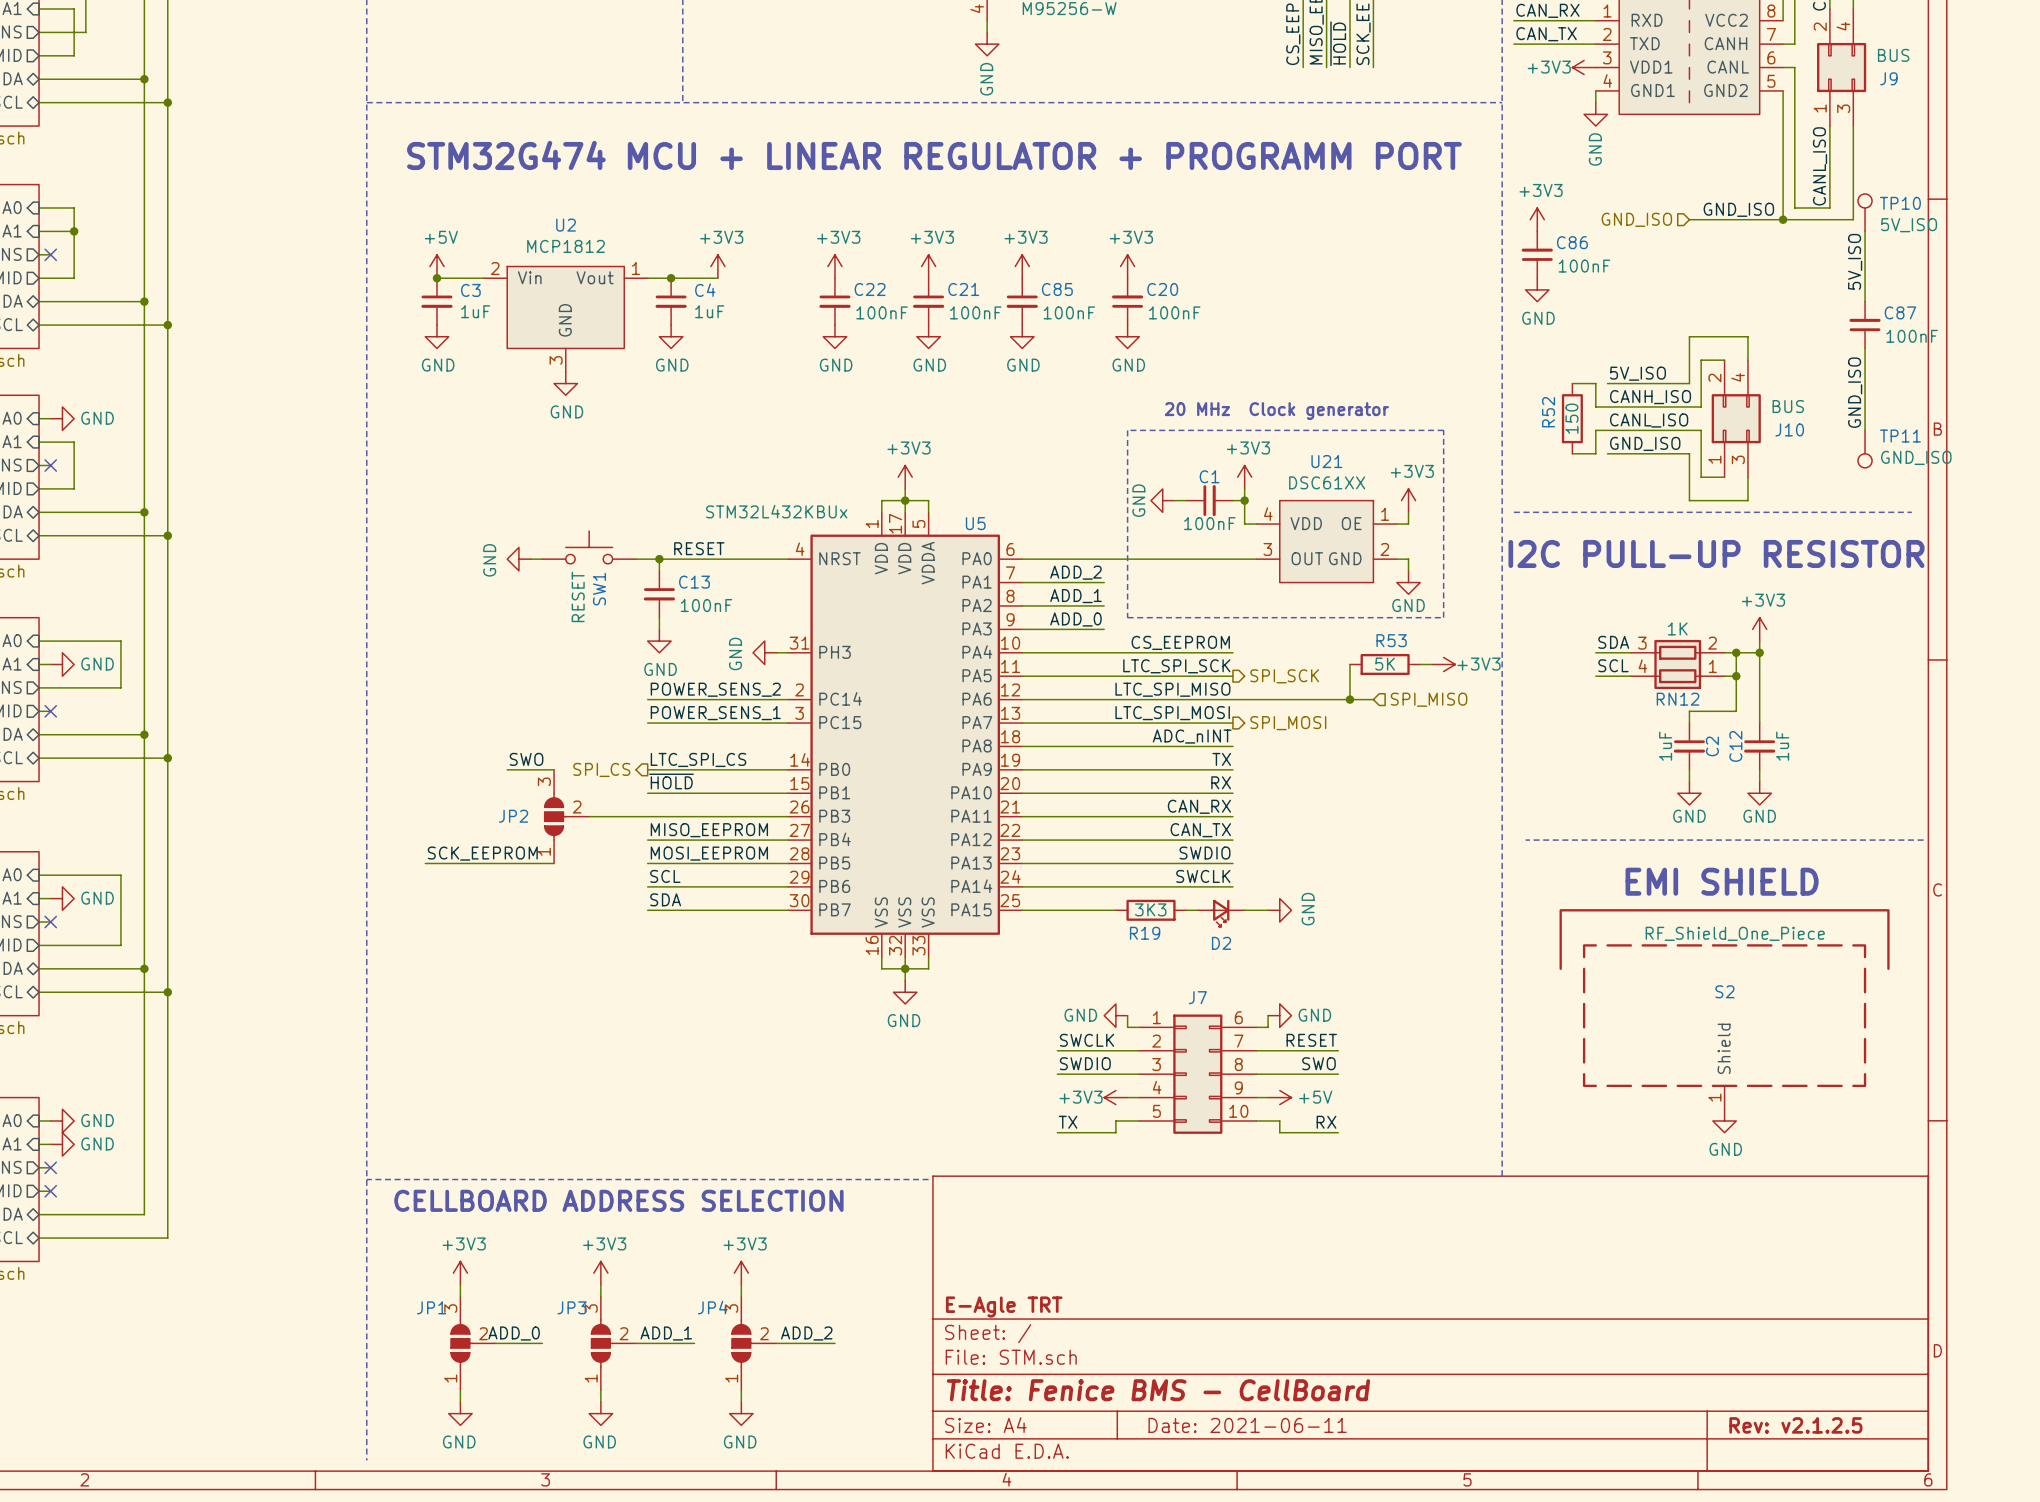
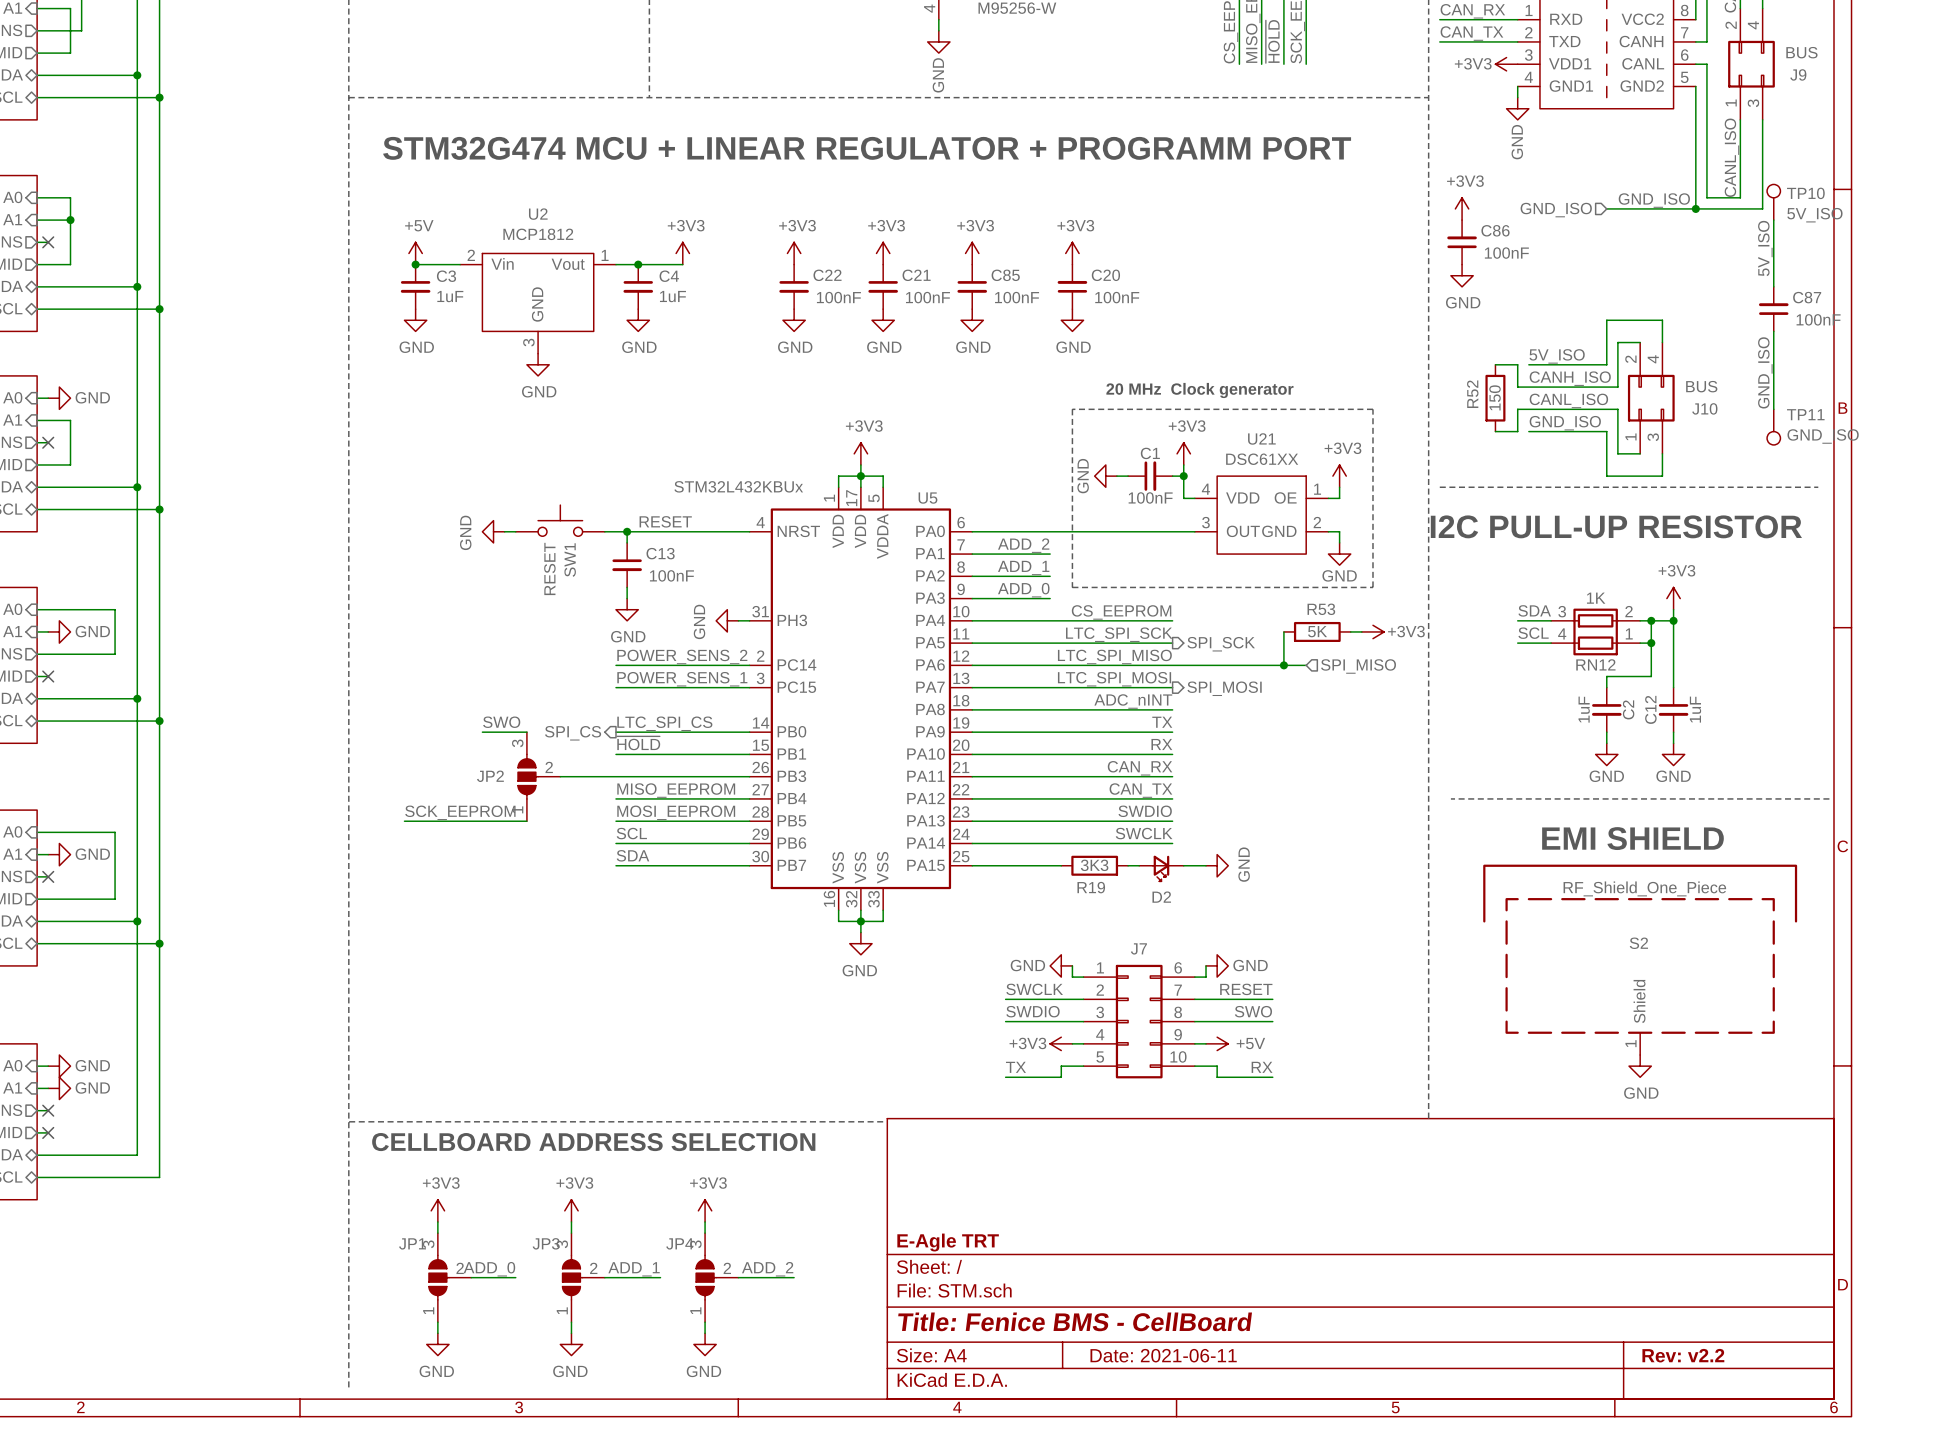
title block: Rev: v2.1.2.5 (1795, 1425) -> Rev: v2.2 (1683, 1355)

